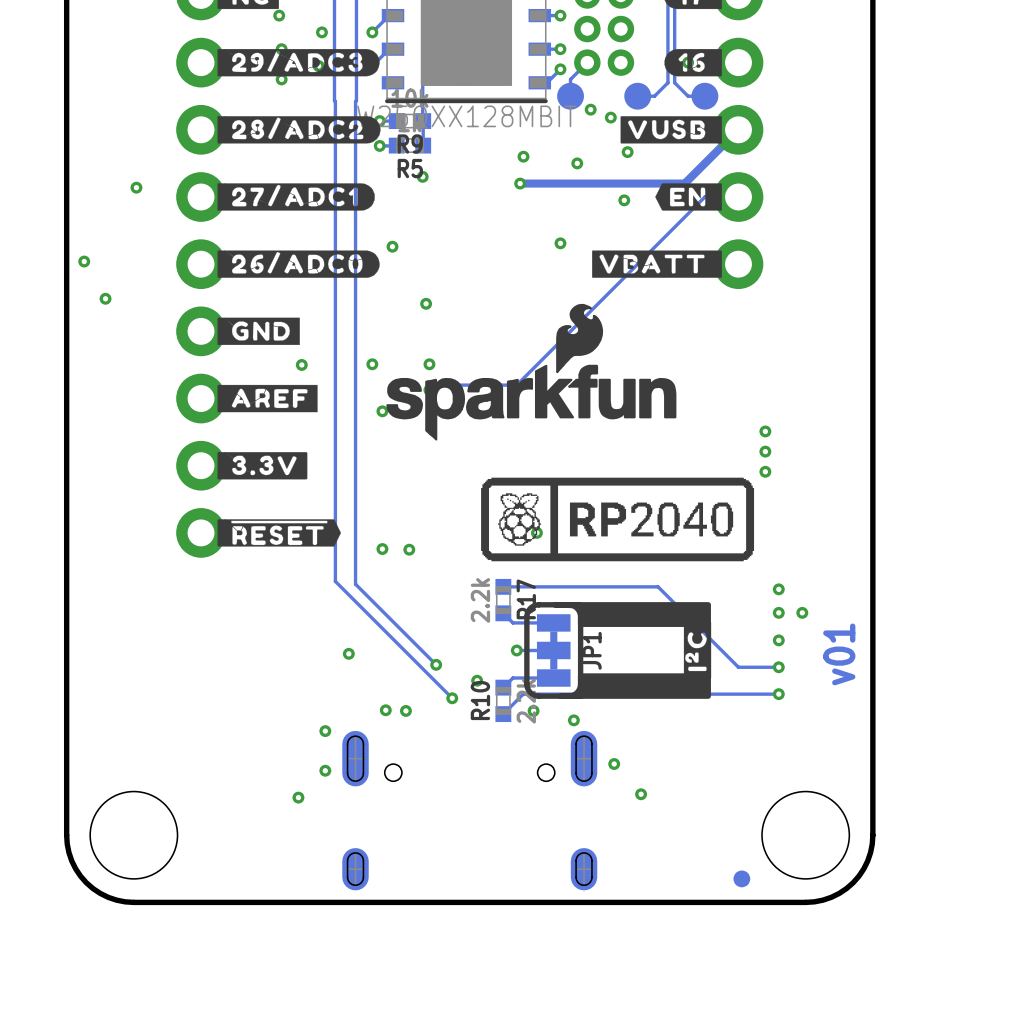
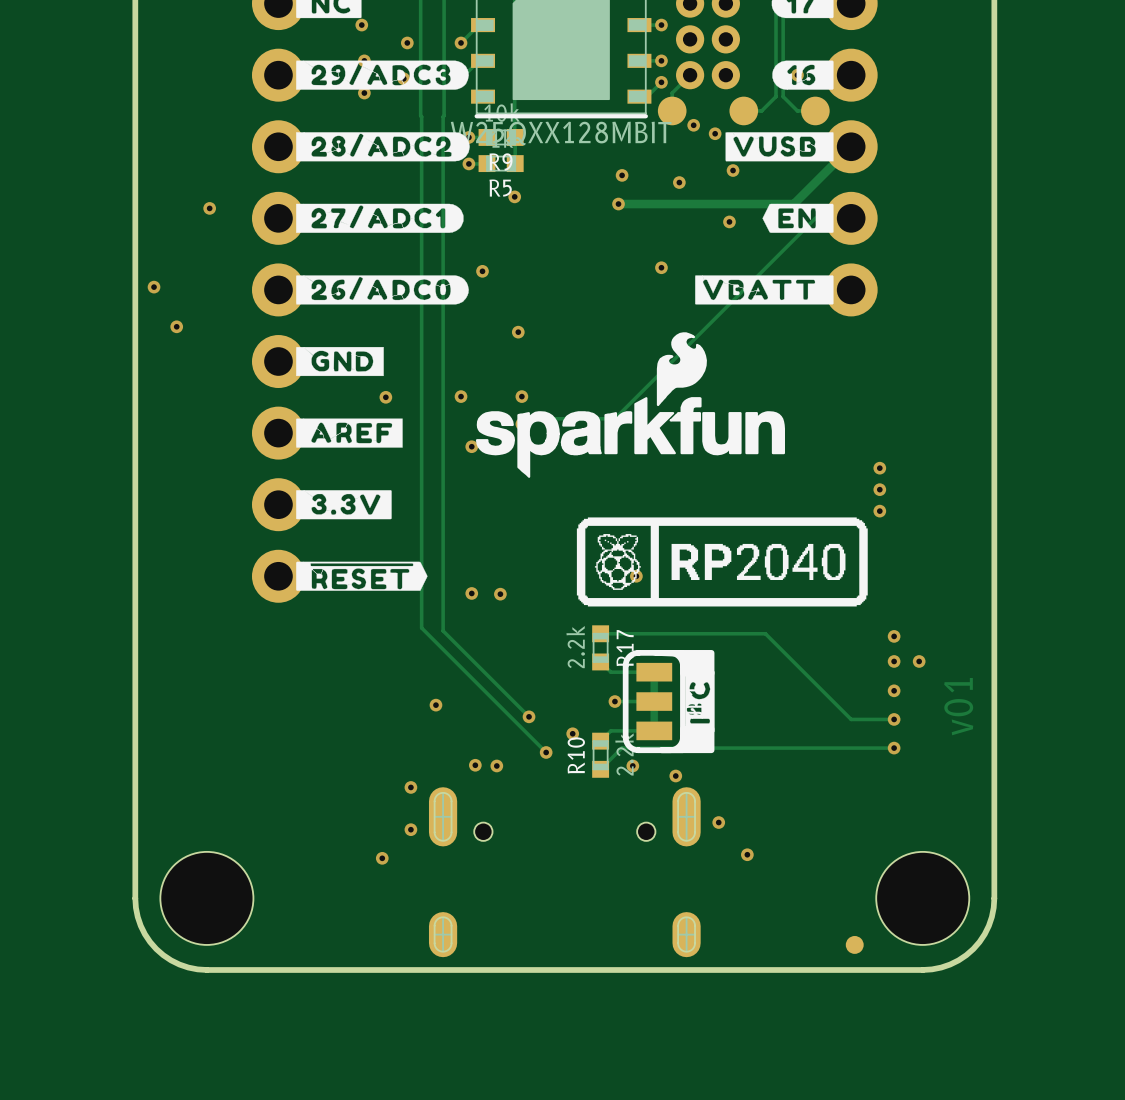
drawing: [551, 602, 711, 627] -> none
drawing: none -> [652, 650, 715, 677]
drawing position: (697, 650) -> (700, 701)
drawing: [557, 673, 711, 699] -> none
drawing: none -> [658, 725, 715, 754]

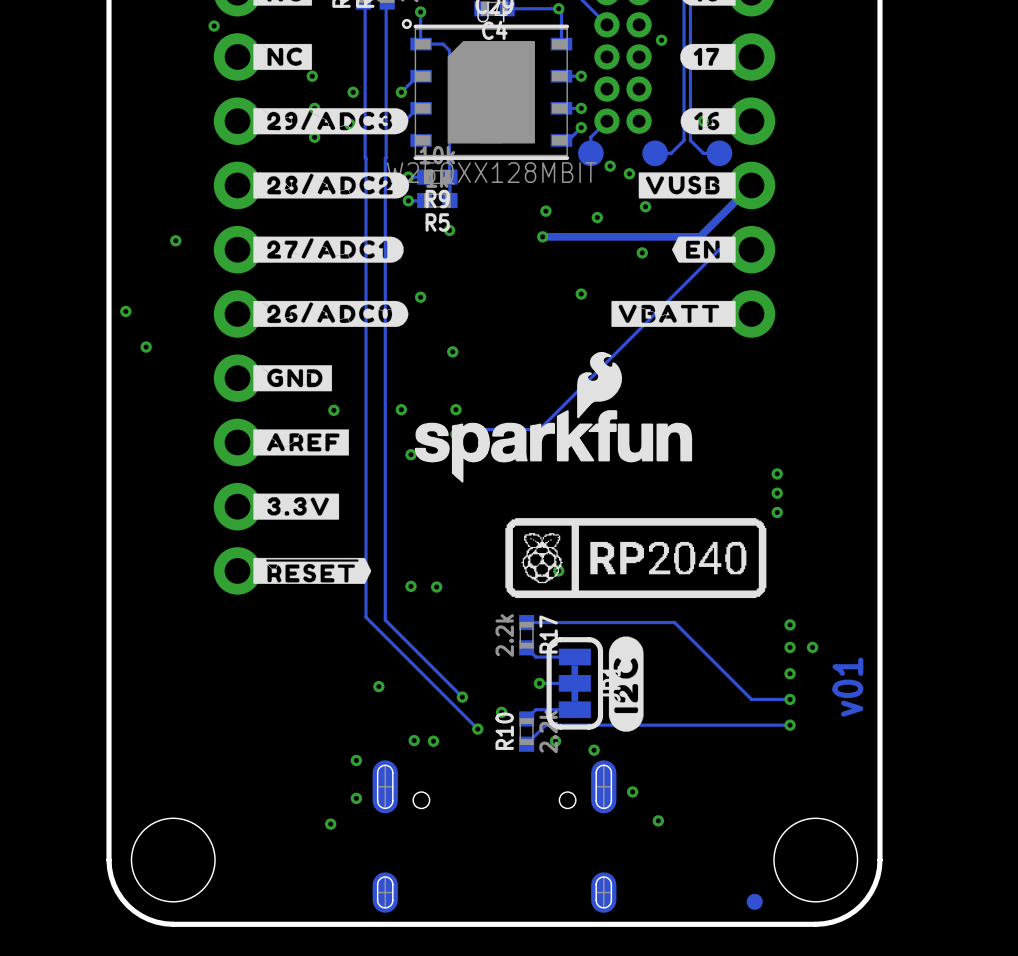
drawing: [652, 650, 715, 677] -> none
drawing shape: [685, 670, 715, 733] -> [608, 636, 644, 732]
drawing: [658, 725, 715, 754] -> none

